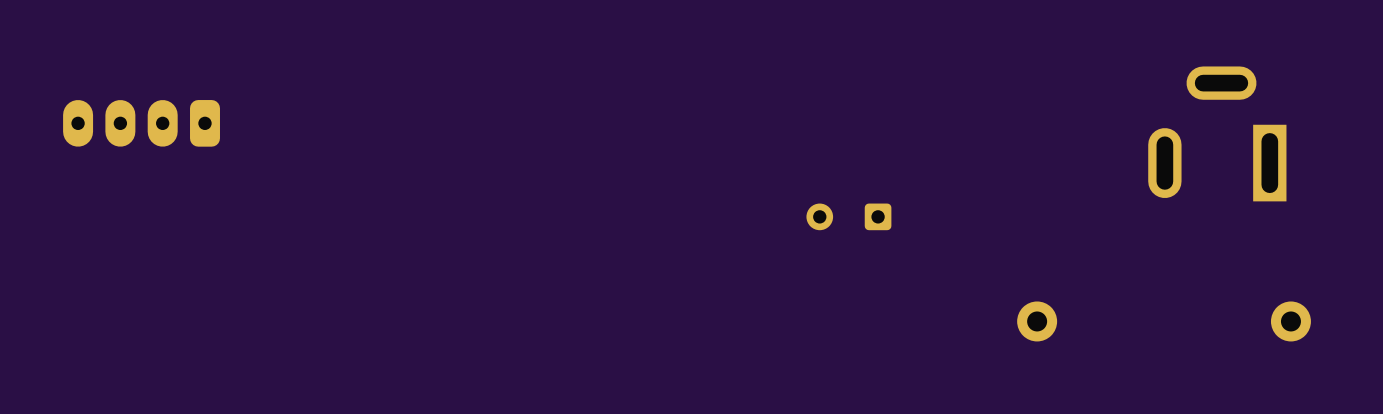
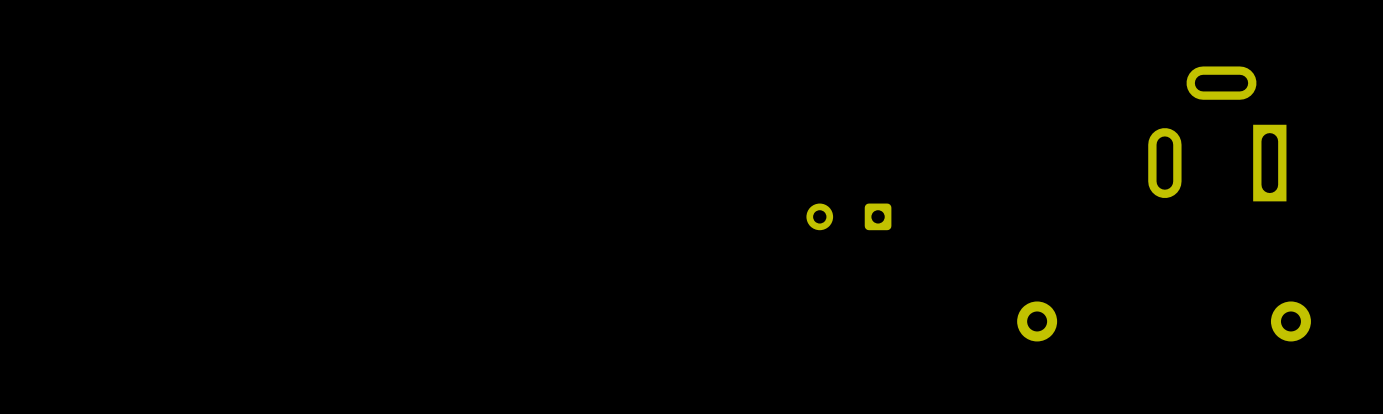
part: (141, 123) -> none

